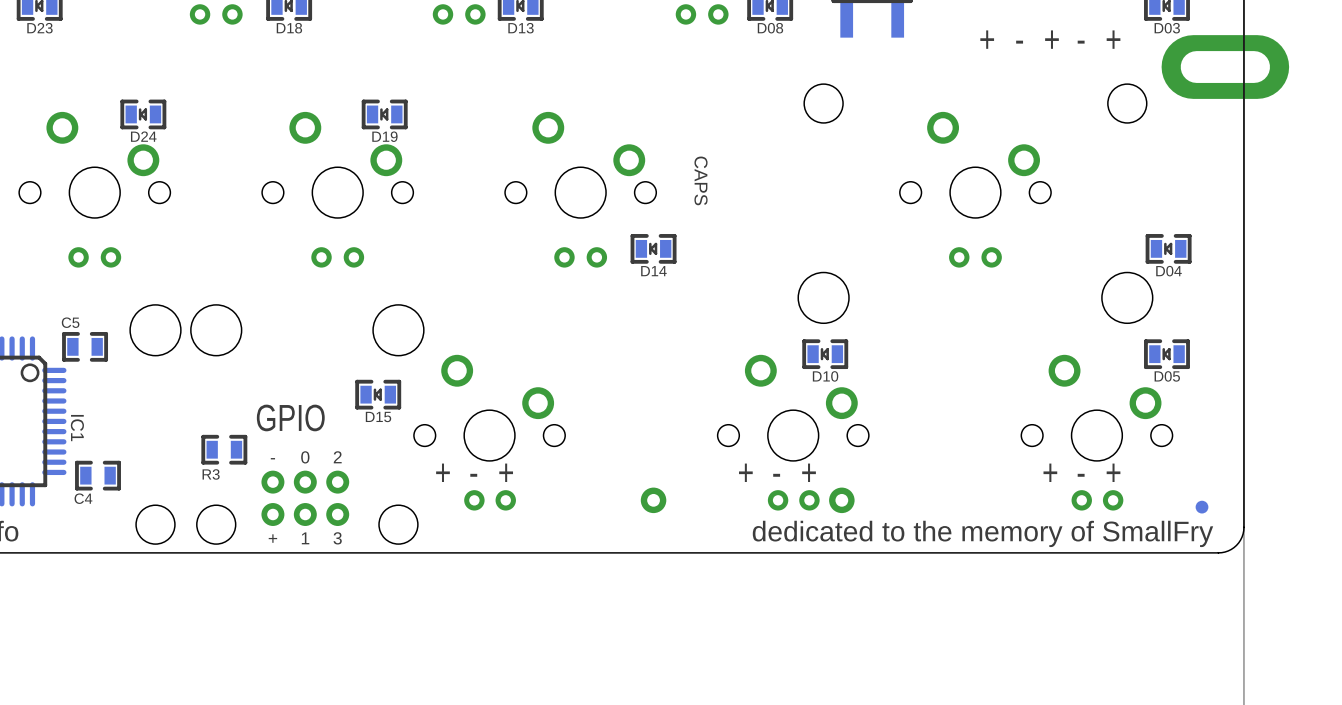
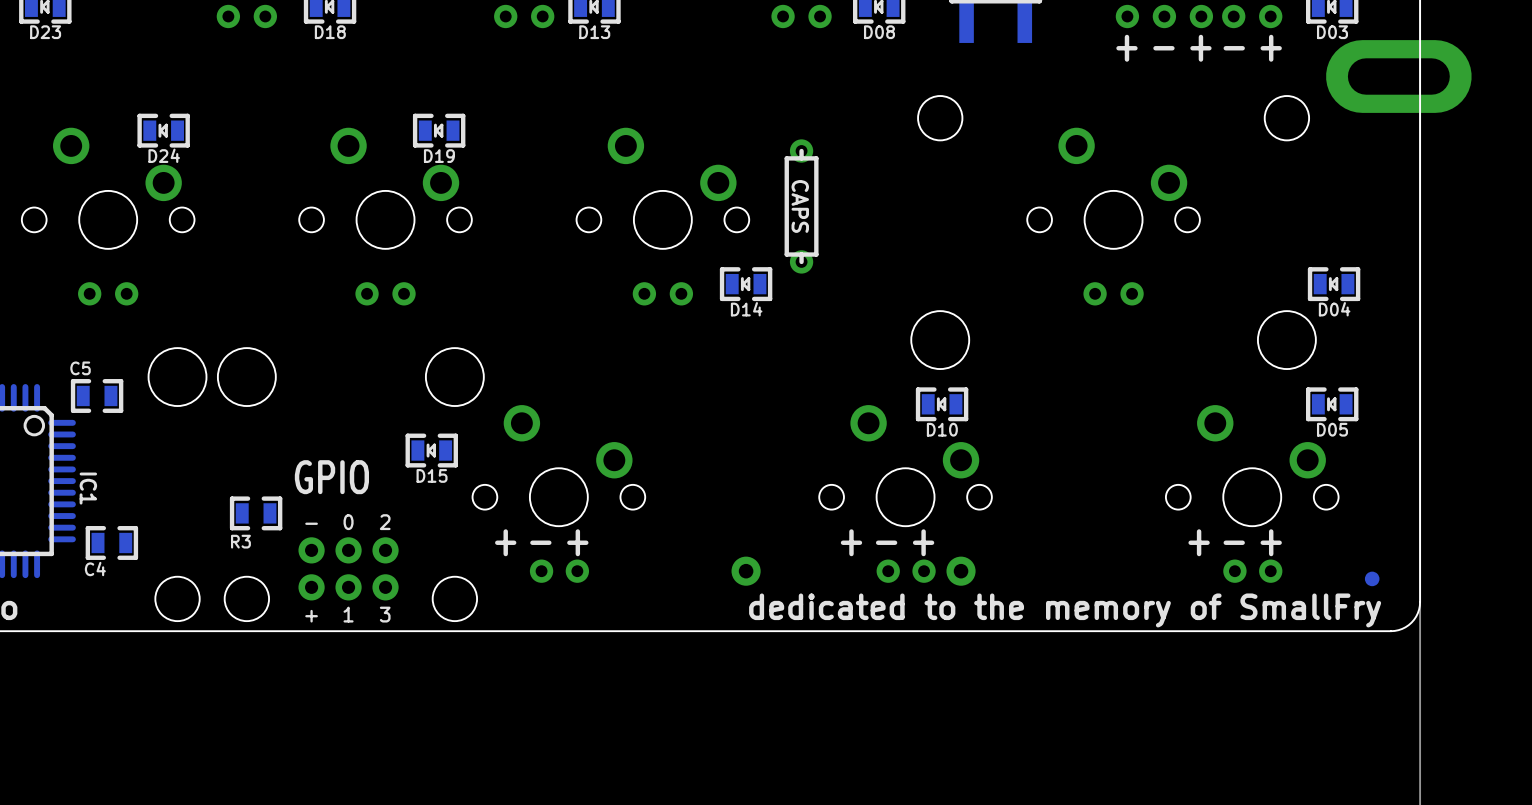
part: none -> (1127, 16)
part: none -> (1182, 16)
part: none -> (1252, 16)
part: none -> (801, 206)

